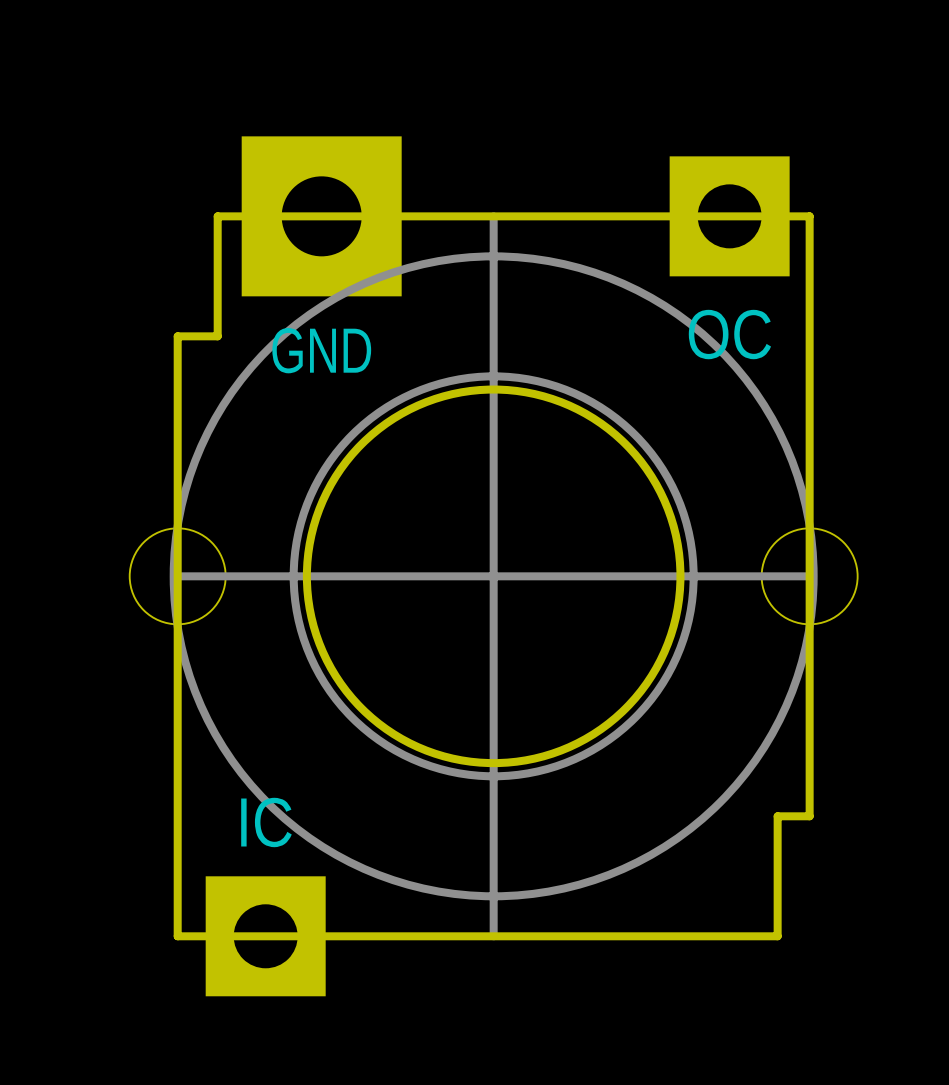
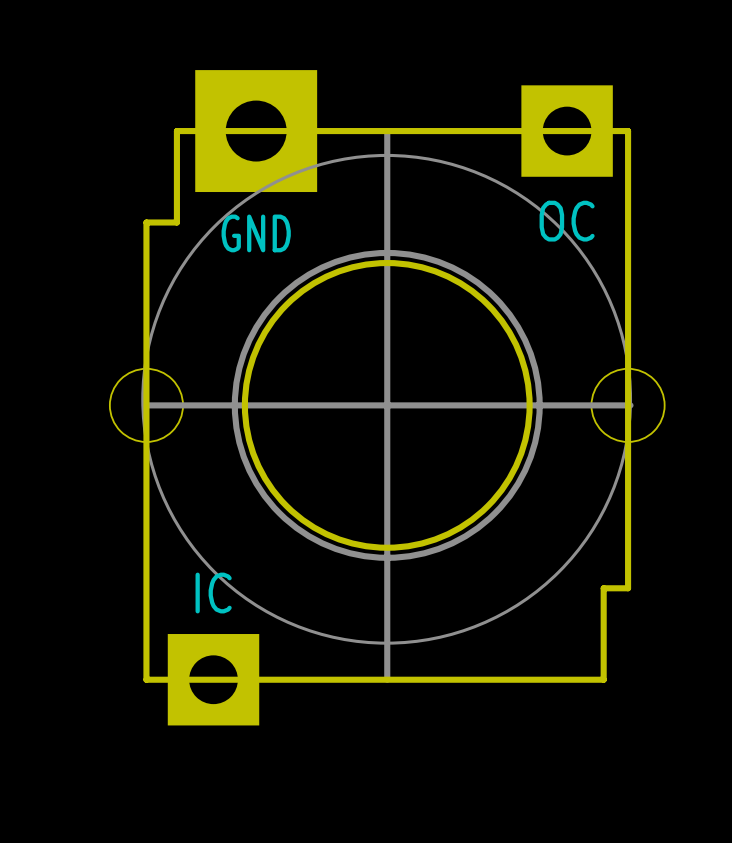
drawing shape: [169, 252, 818, 901] -> [141, 153, 633, 645]

